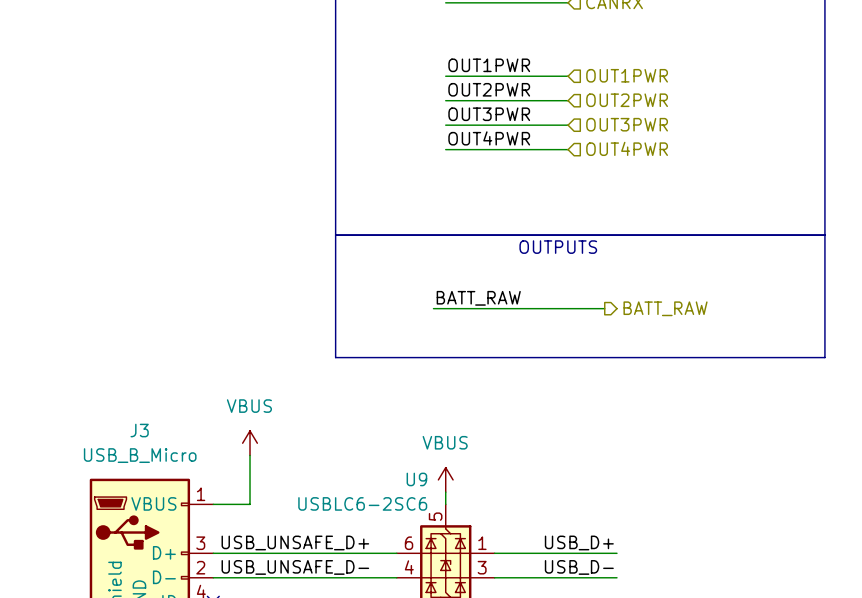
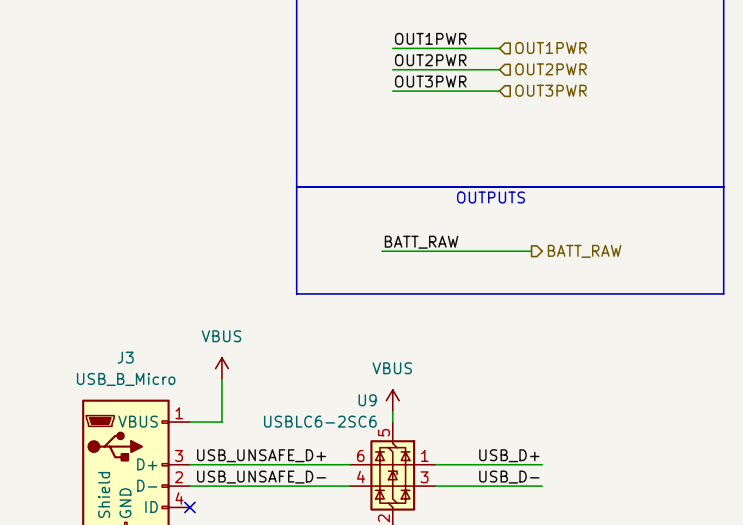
label: OUT4PWR (489, 138) -> none
hierarchical label: OUT4PWR (627, 148) -> none
wire: (445, 149) (568, 149) -> none

